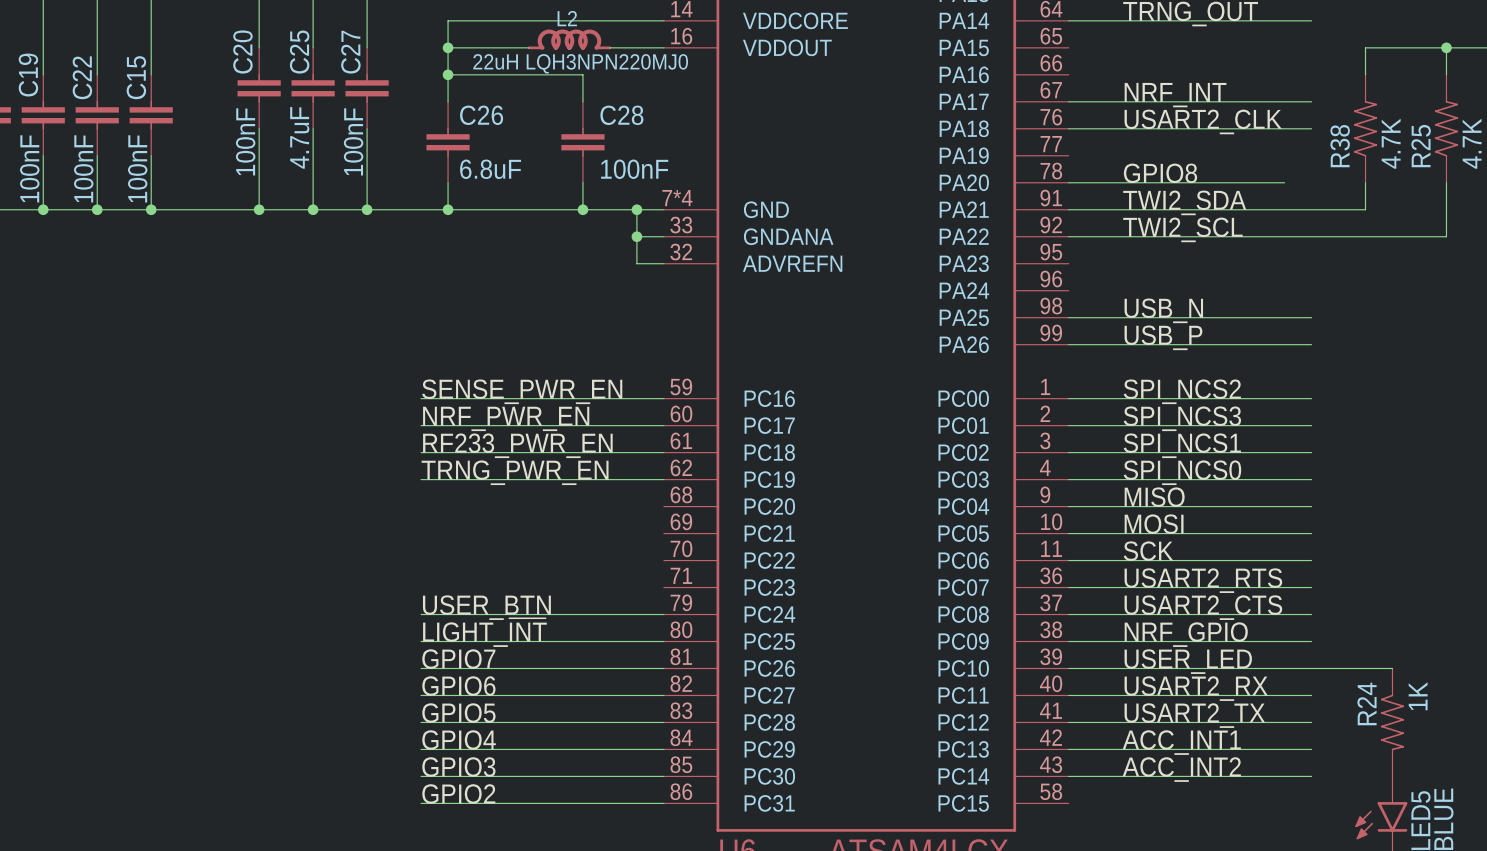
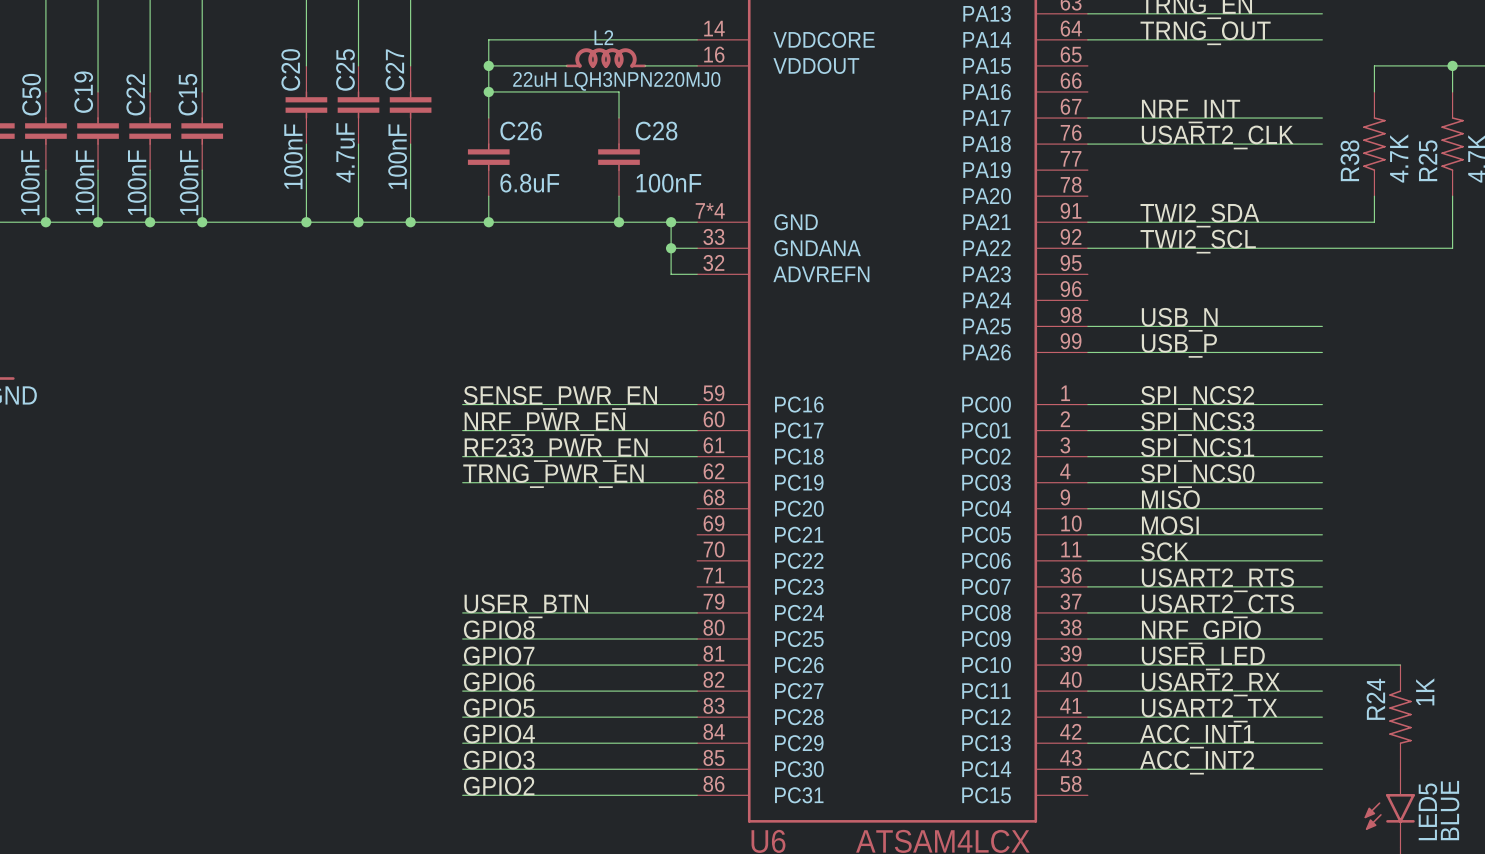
label: GPIO8 (1160, 173) -> none
wire: (1068, 182) (1284, 182) -> none
label: LIGHT_~{INT} (484, 632) -> GPIO8 (499, 629)

